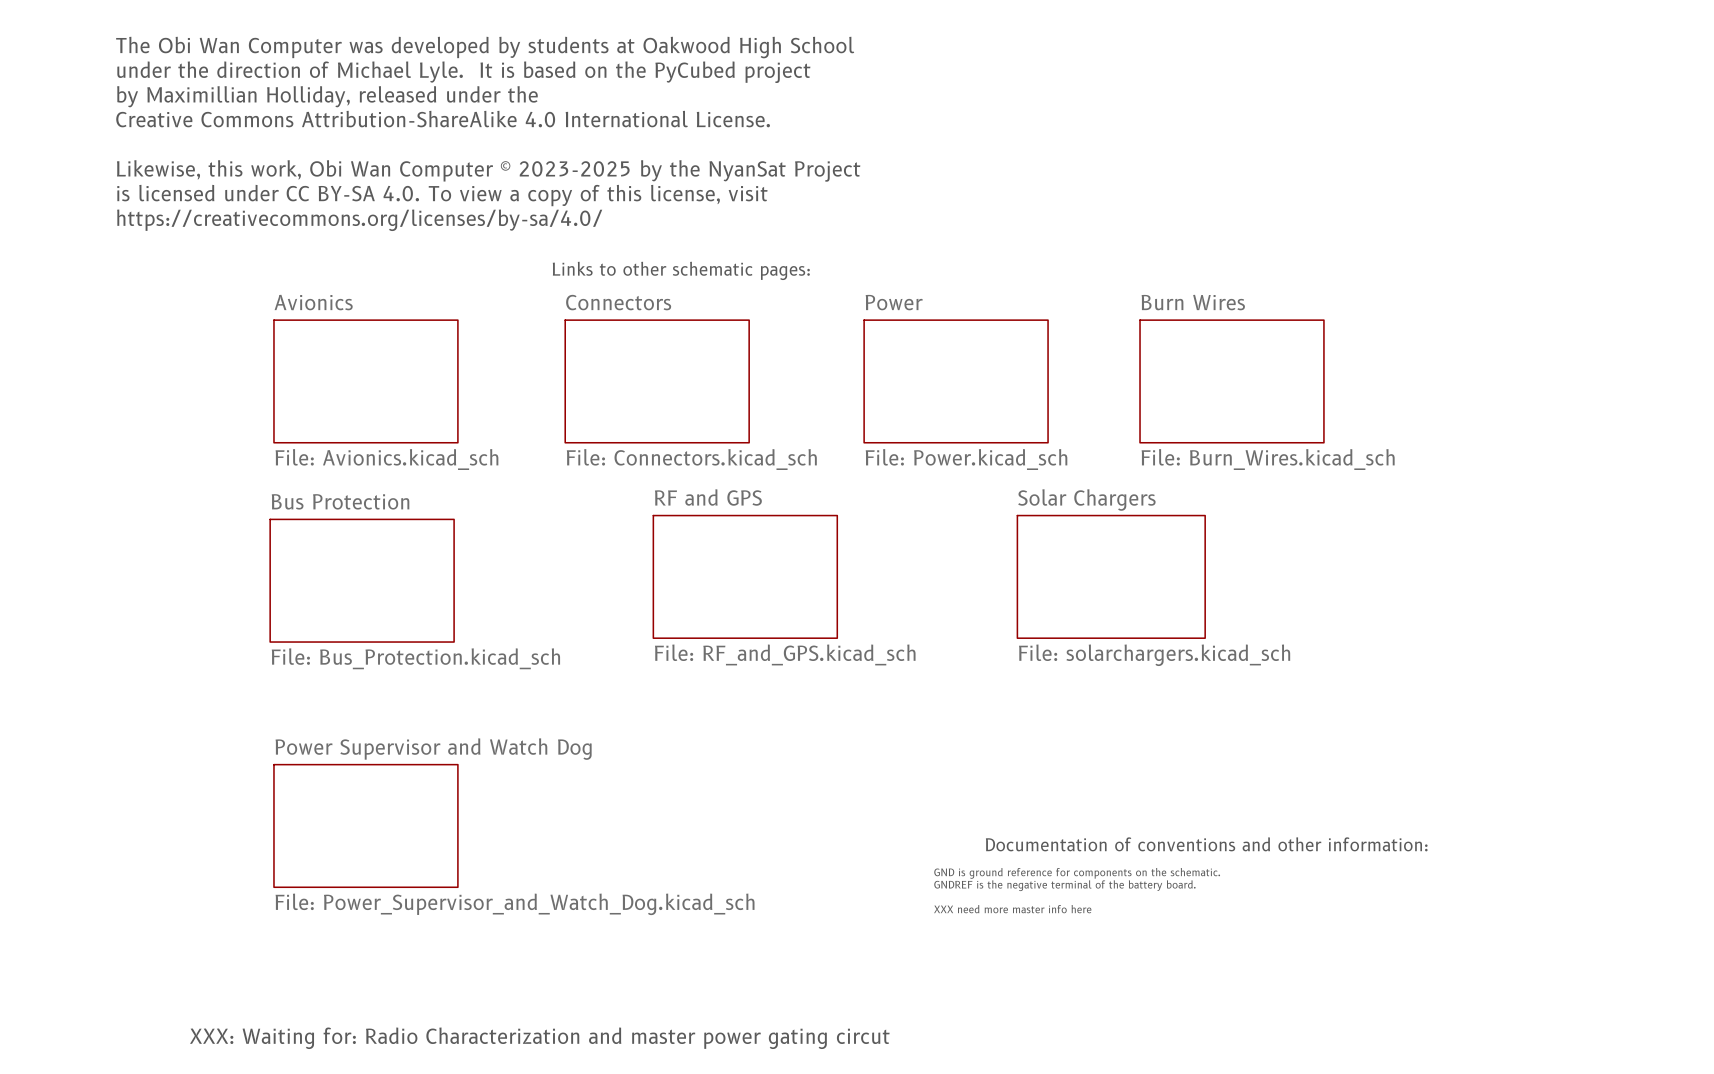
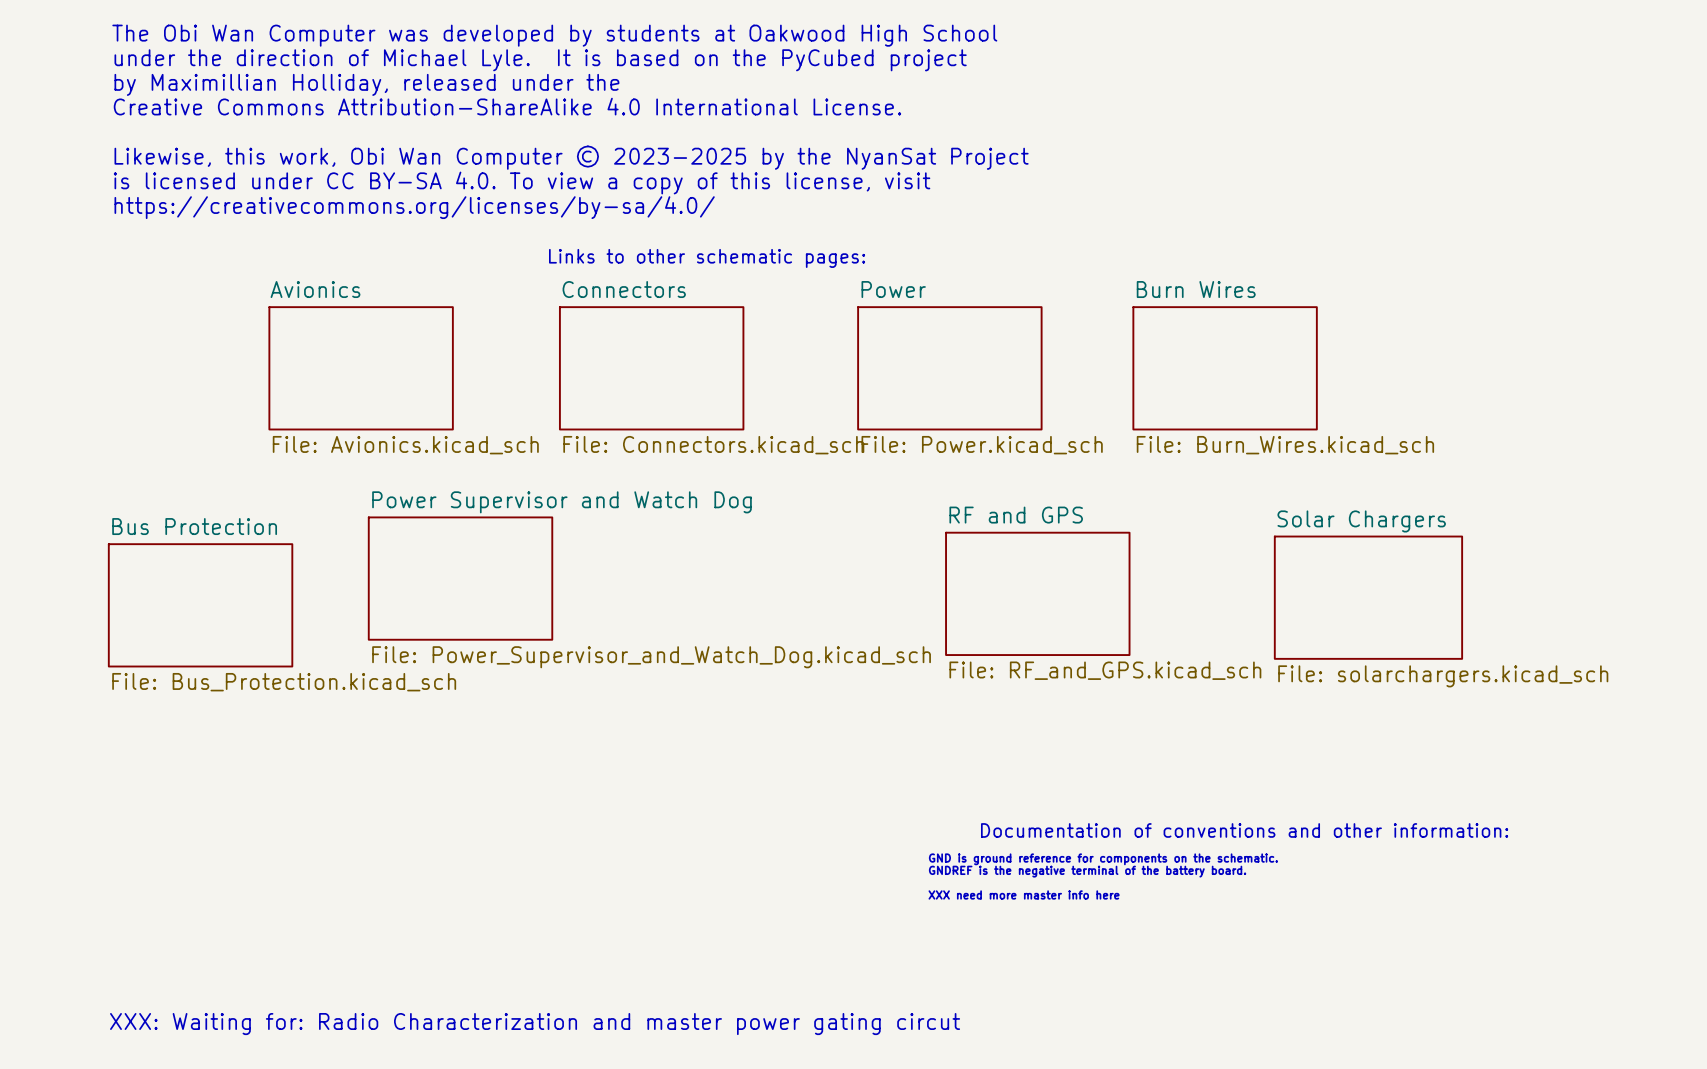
sheet RF and GPS: File: RF_and_GPS.kicad_sch (745, 576) -> none
sheet Solar Chargers: File: solarchargers.kicad_sch (1111, 576) -> none
sheet Bus Protection: File: Bus_Protection.kicad_sch (362, 580) -> none
sheet Power Supervisor and Watch Dog: none -> File: Power_Supervisor_and_Watch_Dog.kicad_sch (460, 578)
sheet RF and GPS: none -> File: RF_and_GPS.kicad_sch (1037, 593)
sheet Solar Chargers: none -> File: solarchargers.kicad_sch (1368, 597)
sheet Bus Protection: none -> File: Bus_Protection.kicad_sch (200, 605)
sheet Power Supervisor and Watch Dog: File: Power_Supervisor_and_Watch_Dog.kicad_sch (365, 825) -> none

